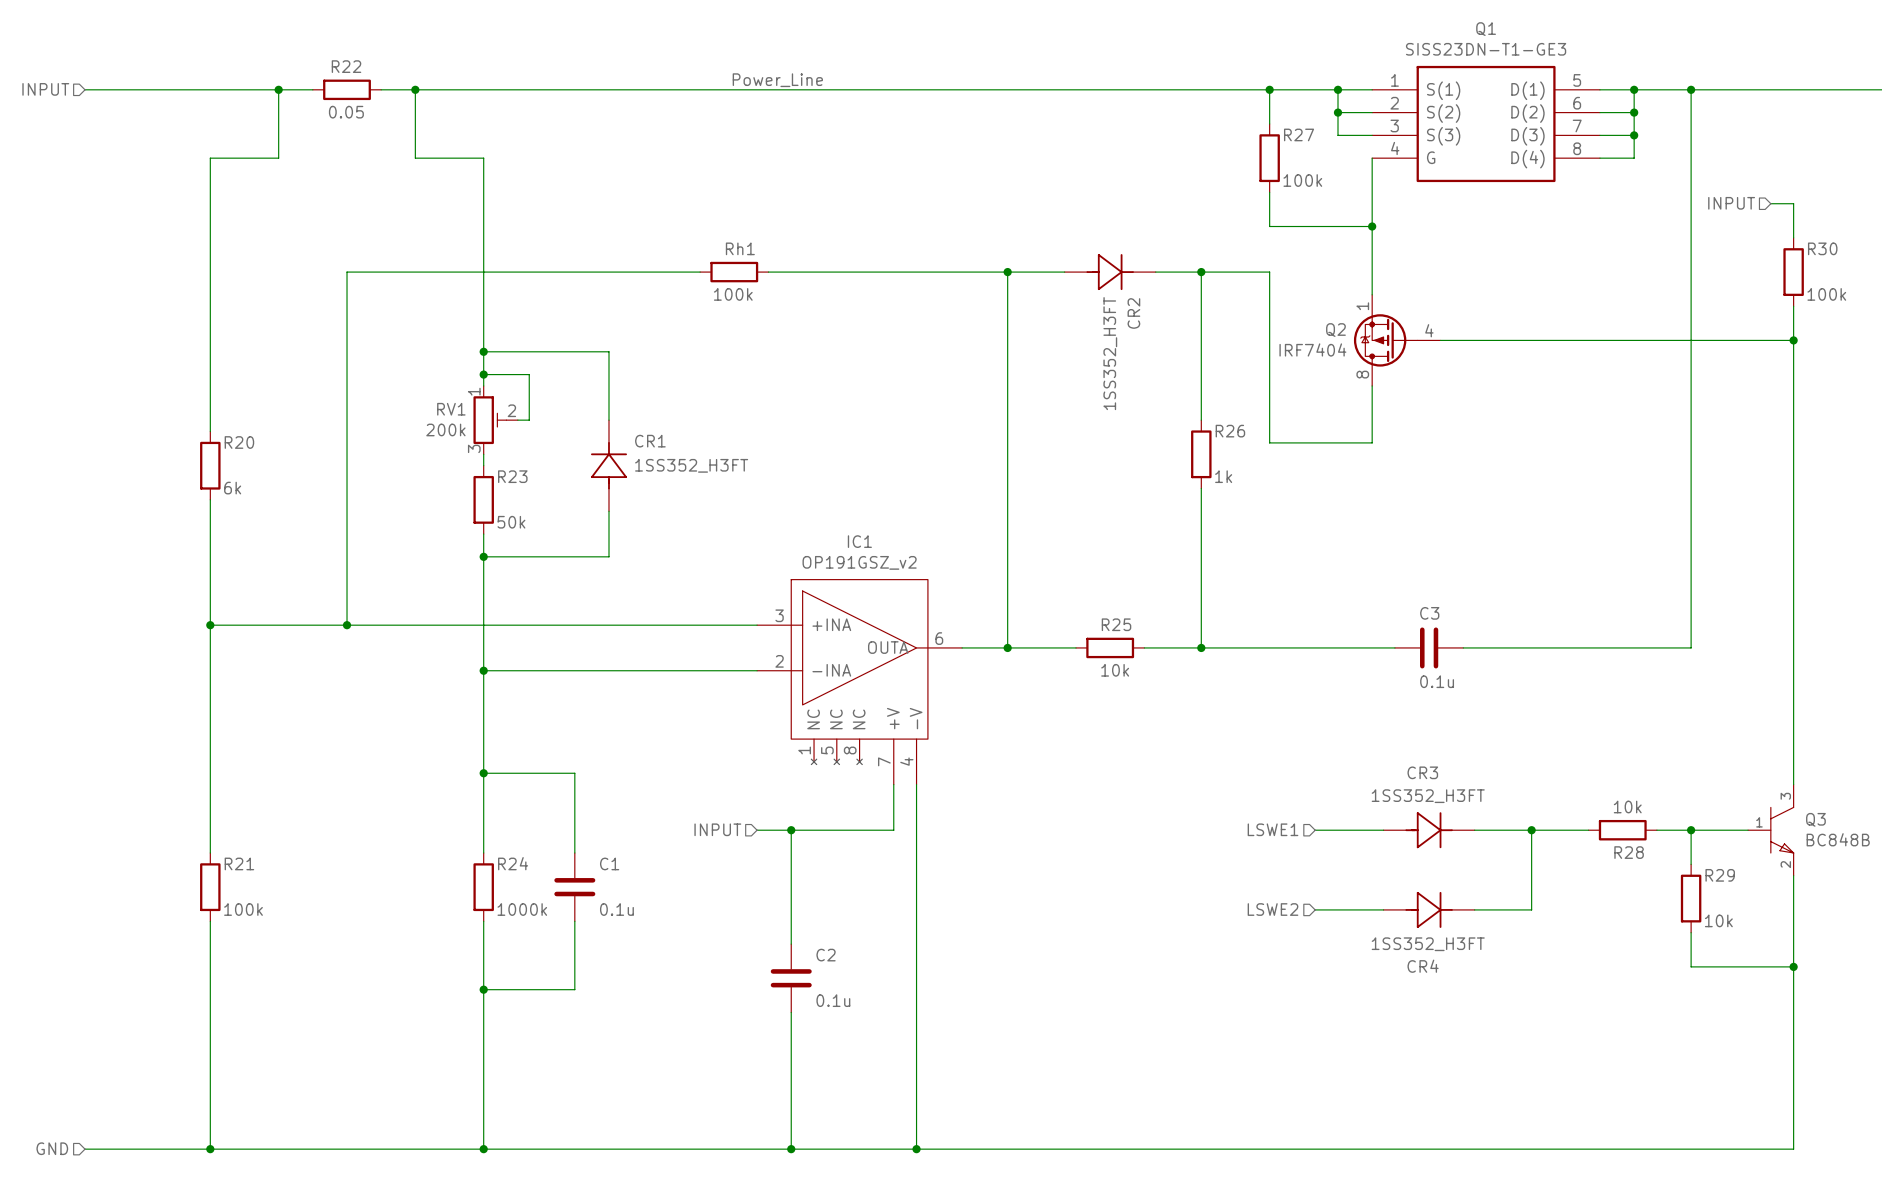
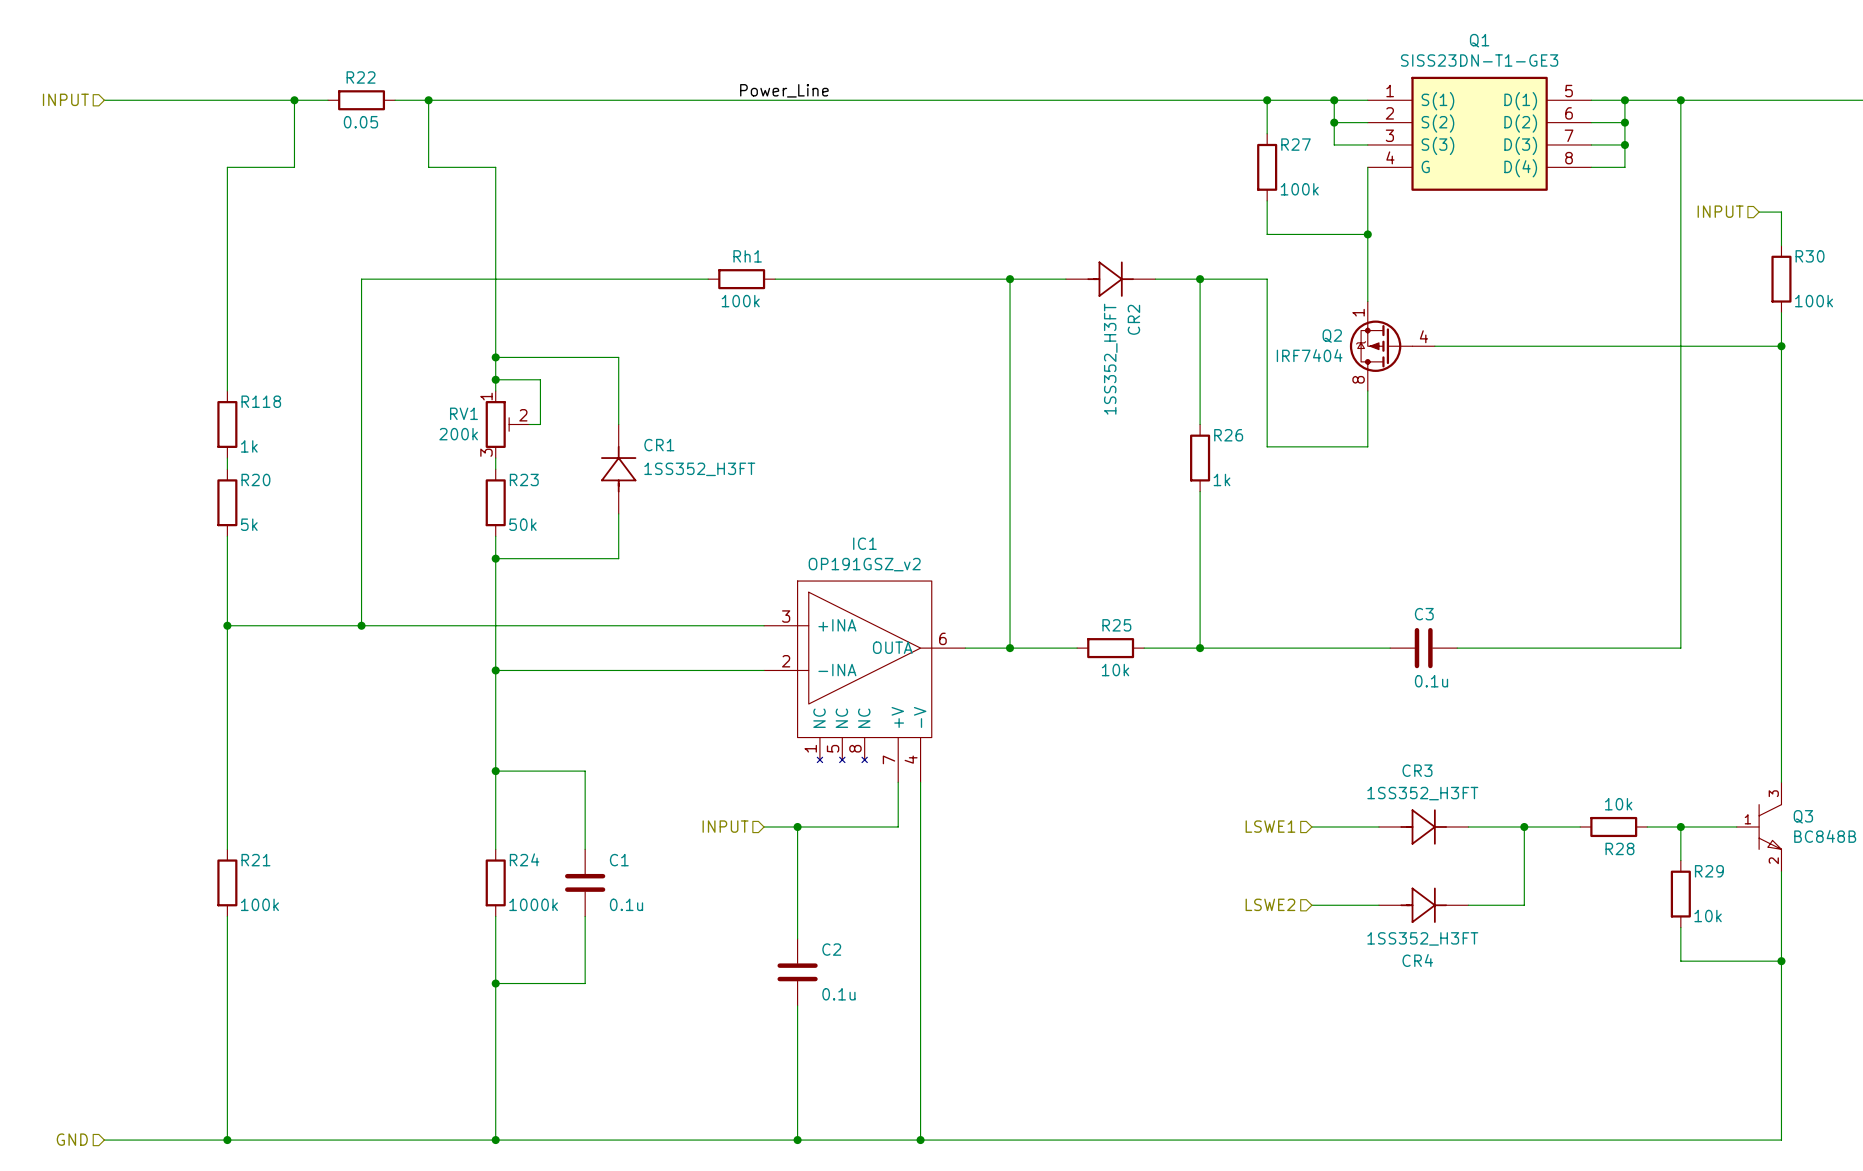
wire: (210, 385) (210, 431) -> none
R118: none -> 1k (227, 424)
wire: none -> (227, 458) (227, 469)
R20 position: (210, 465) -> (227, 502)
R20 value: 6k (232, 488) -> 5k (249, 524)
wire: (210, 499) (210, 534) -> none

